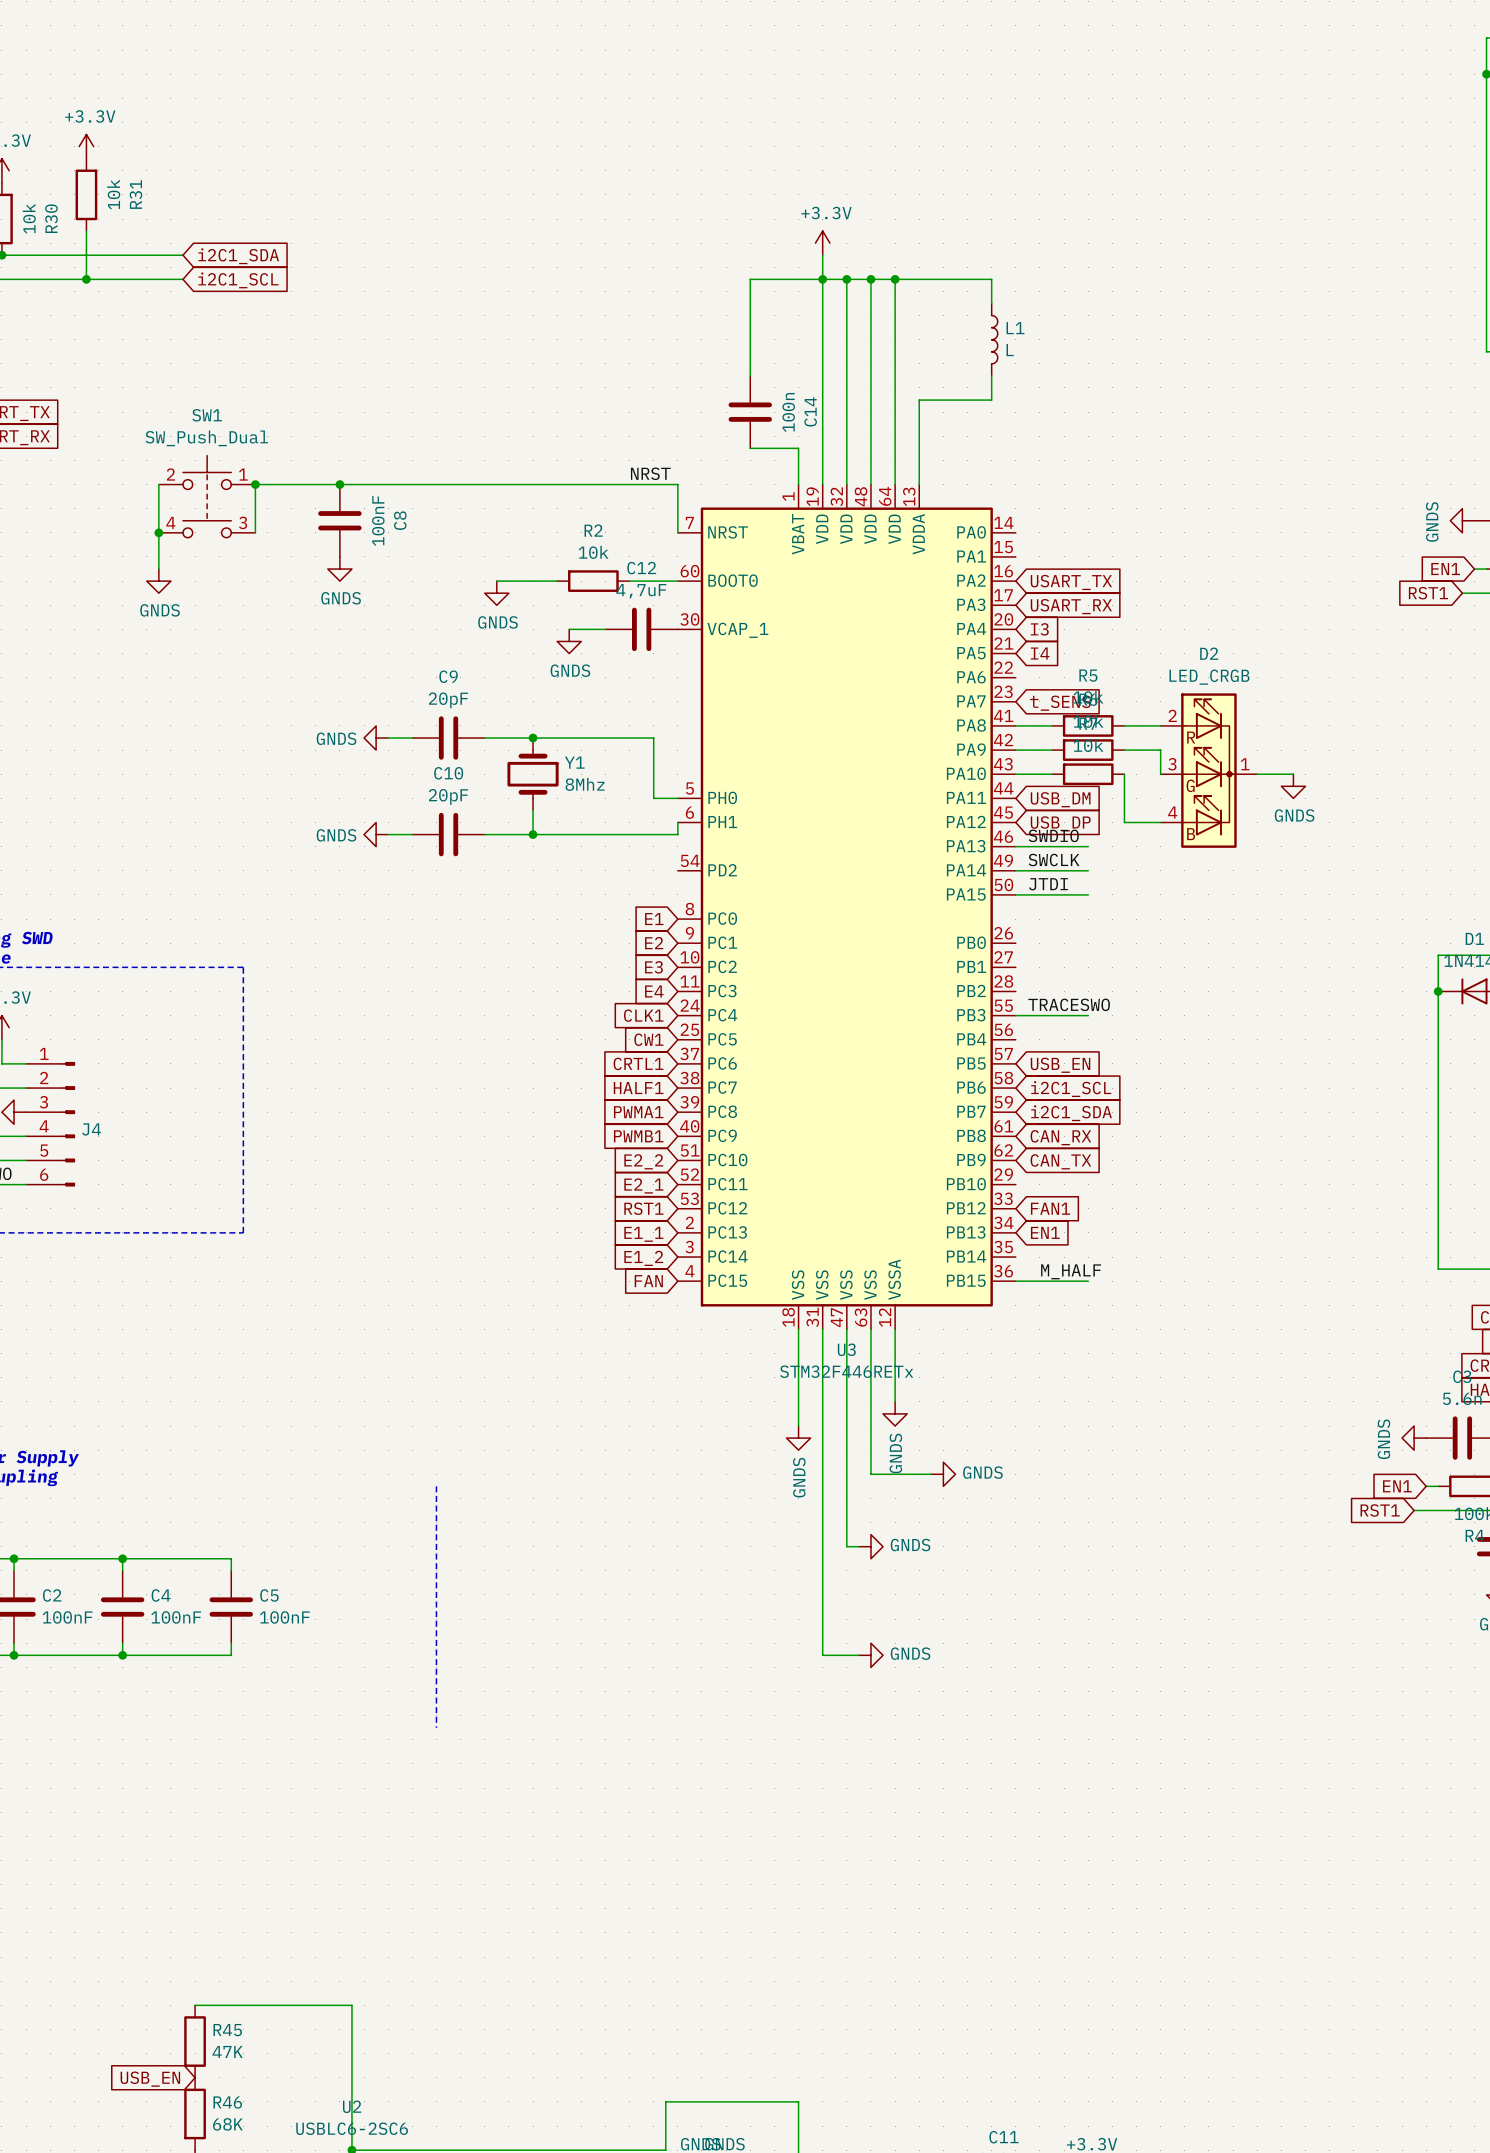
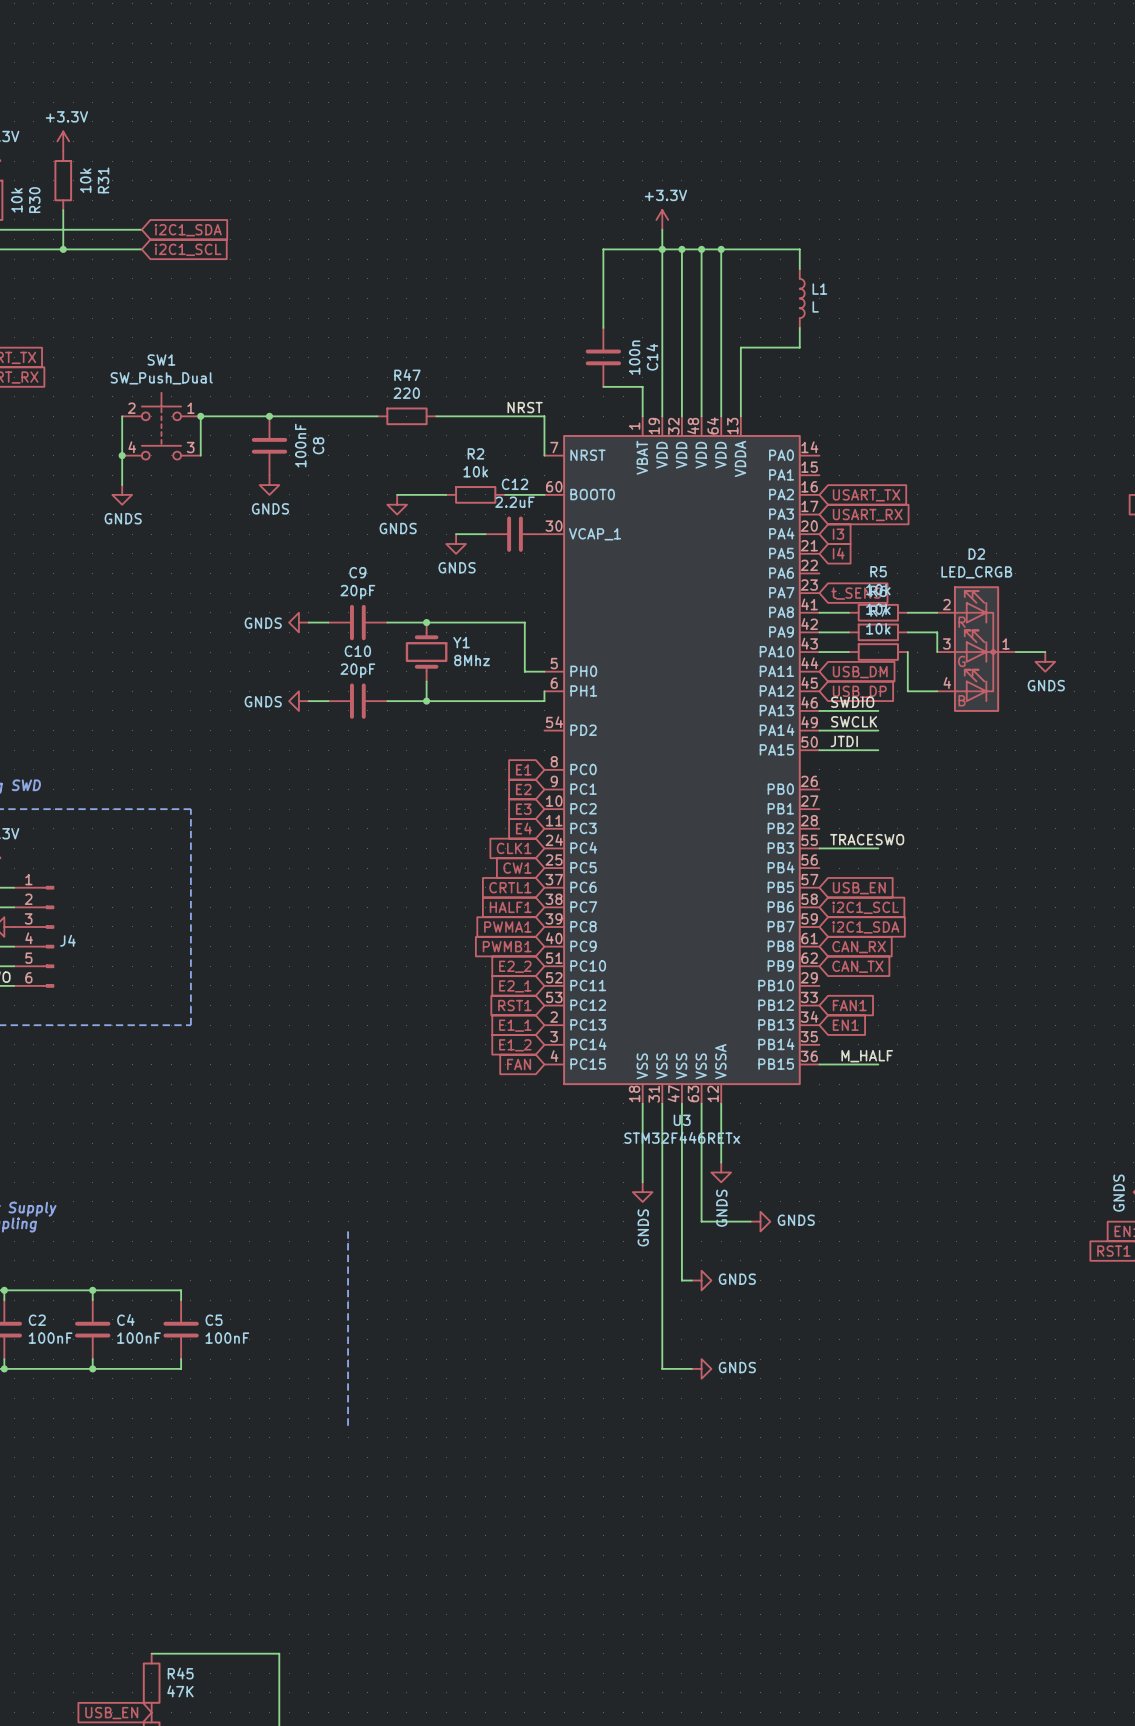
wire: (472, 484) (545, 484) -> none
R47: none -> 220 (406, 416)
C12 value: 4,7uF (641, 591) -> 2.2uF (514, 502)

